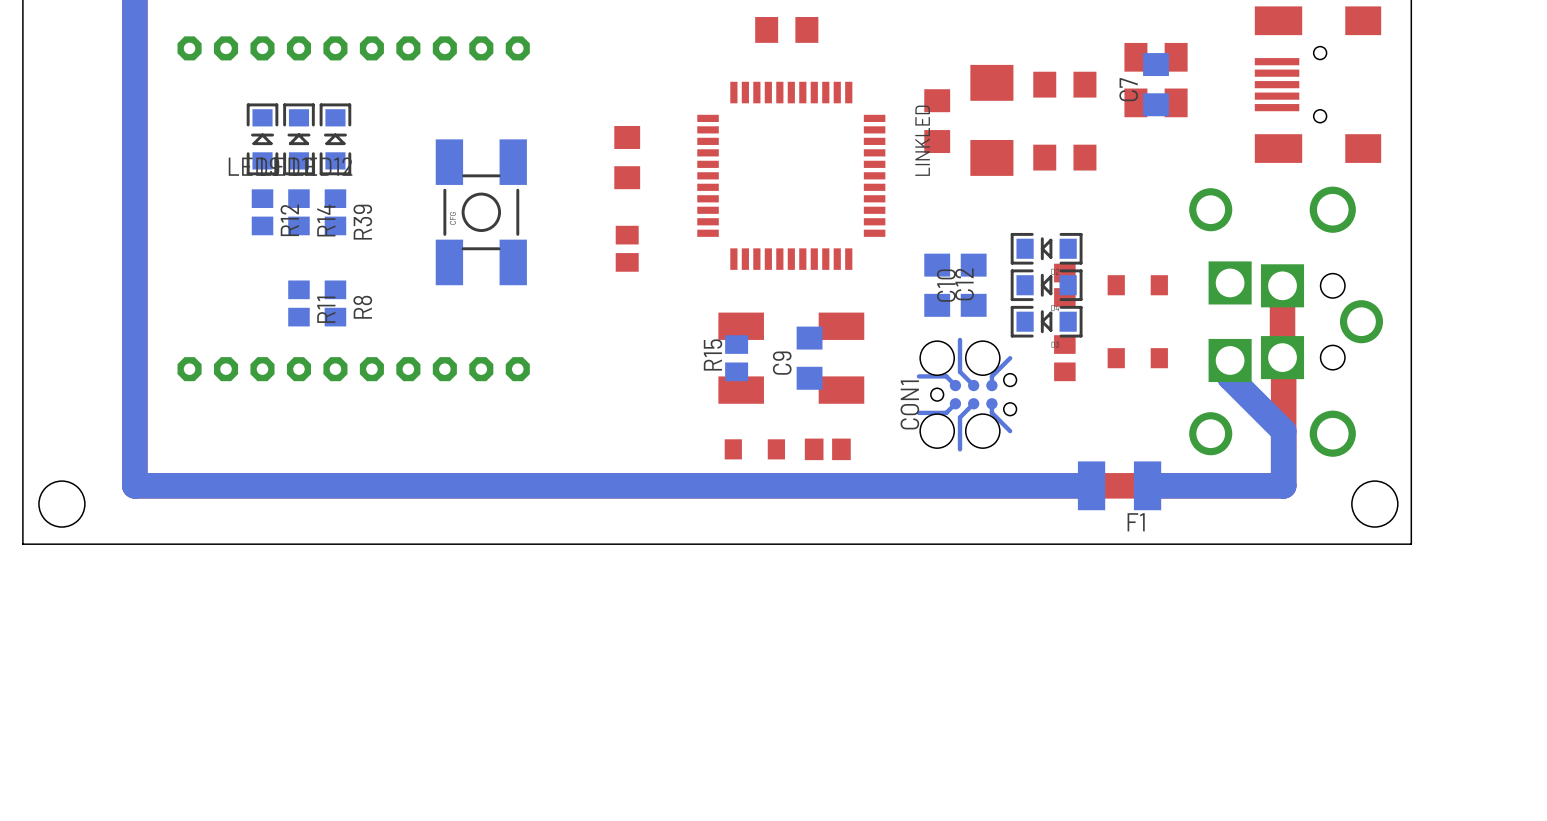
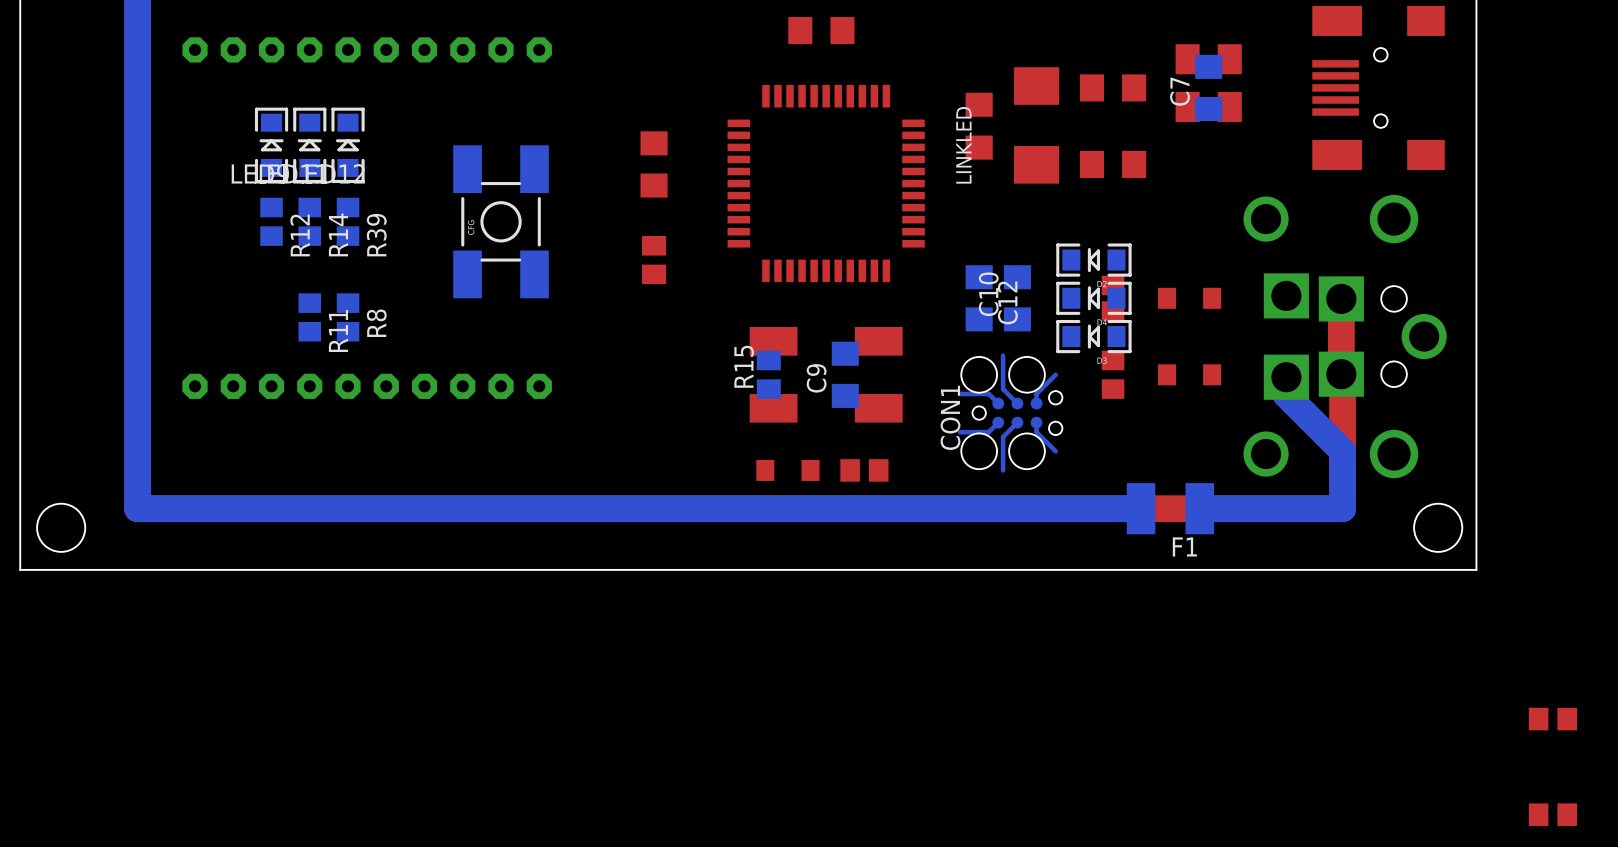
part: none -> (1552, 719)
part: none -> (1552, 814)

